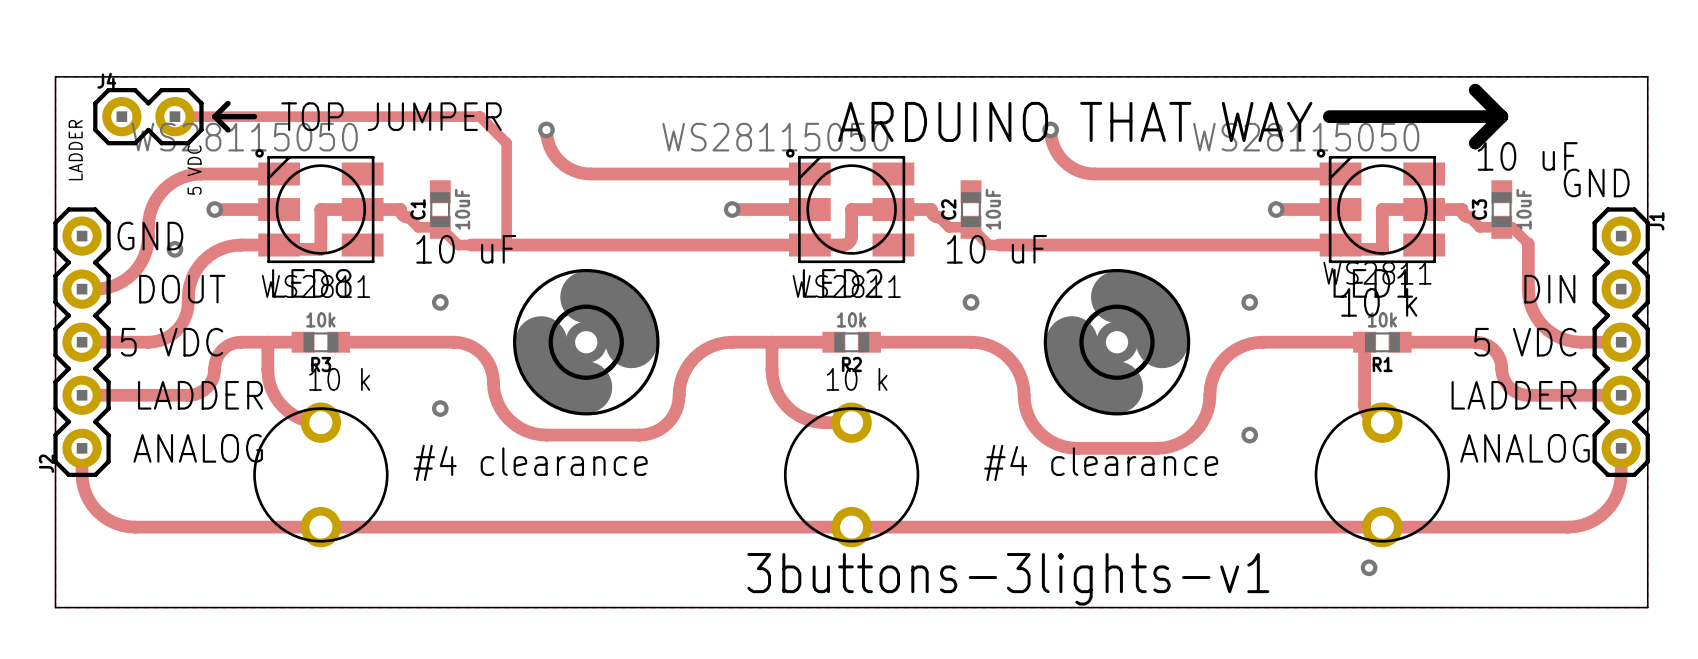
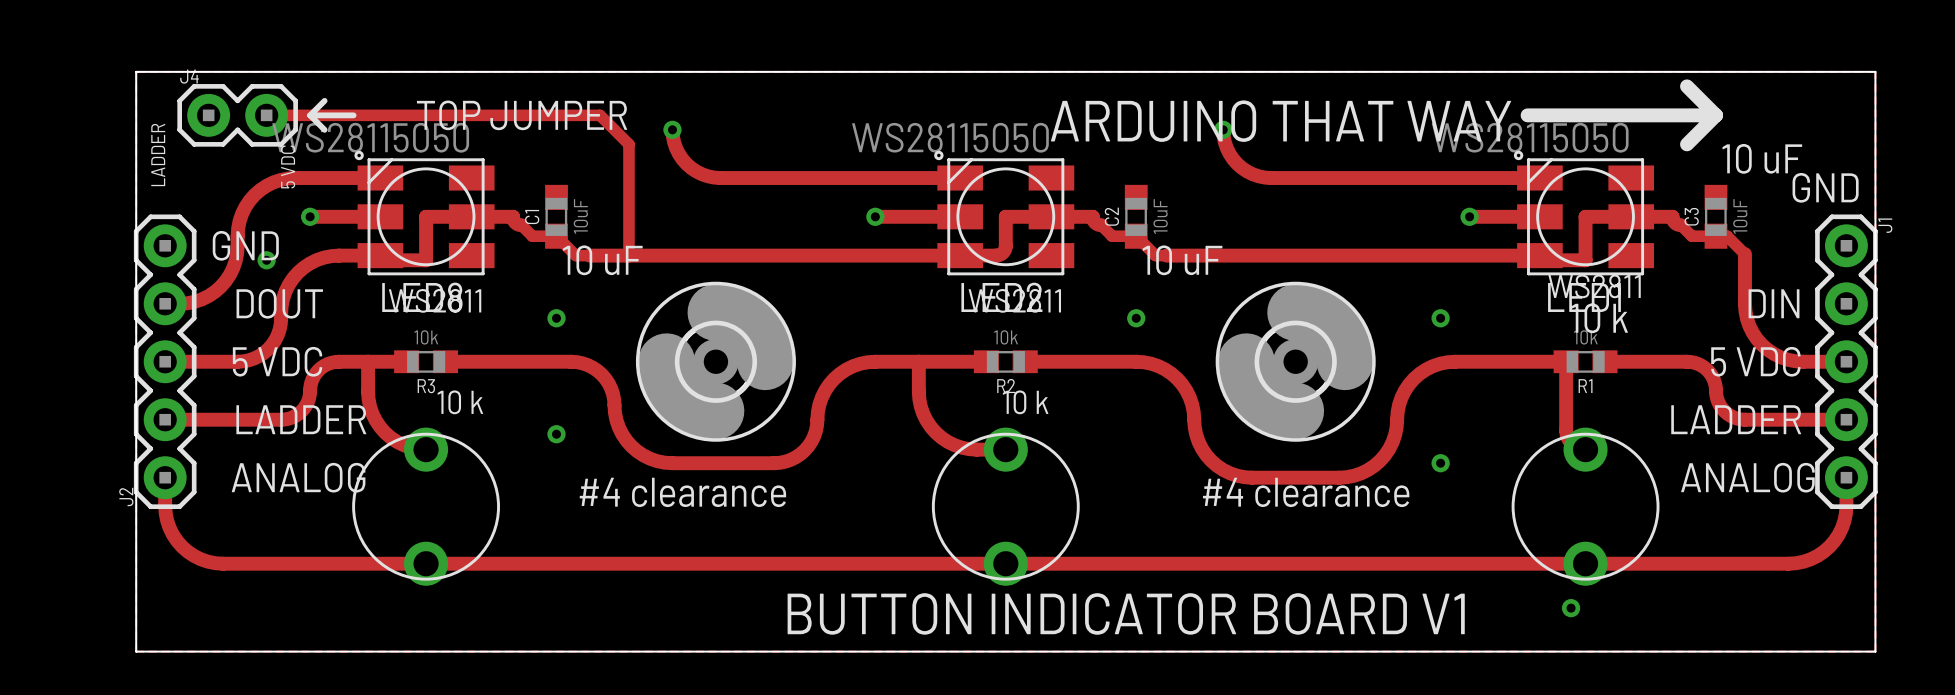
text: 3buttons-3lights-v1 (1008, 579) -> BUTTON INDICATOR BOARD V1 (1126, 613)

